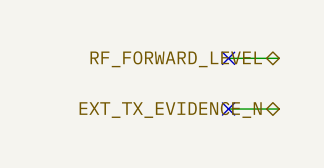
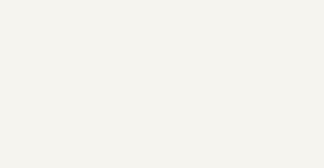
wire: (228, 58) (279, 58) -> none
no-connect mark: (228, 58) -> none
hierarchical label: RF_FORWARD_LEVEL (176, 59) -> none
hierarchical label: EXT_TX_EVIDENCE_N (170, 109) -> none
wire: (228, 109) (279, 109) -> none
no-connect mark: (228, 109) -> none

